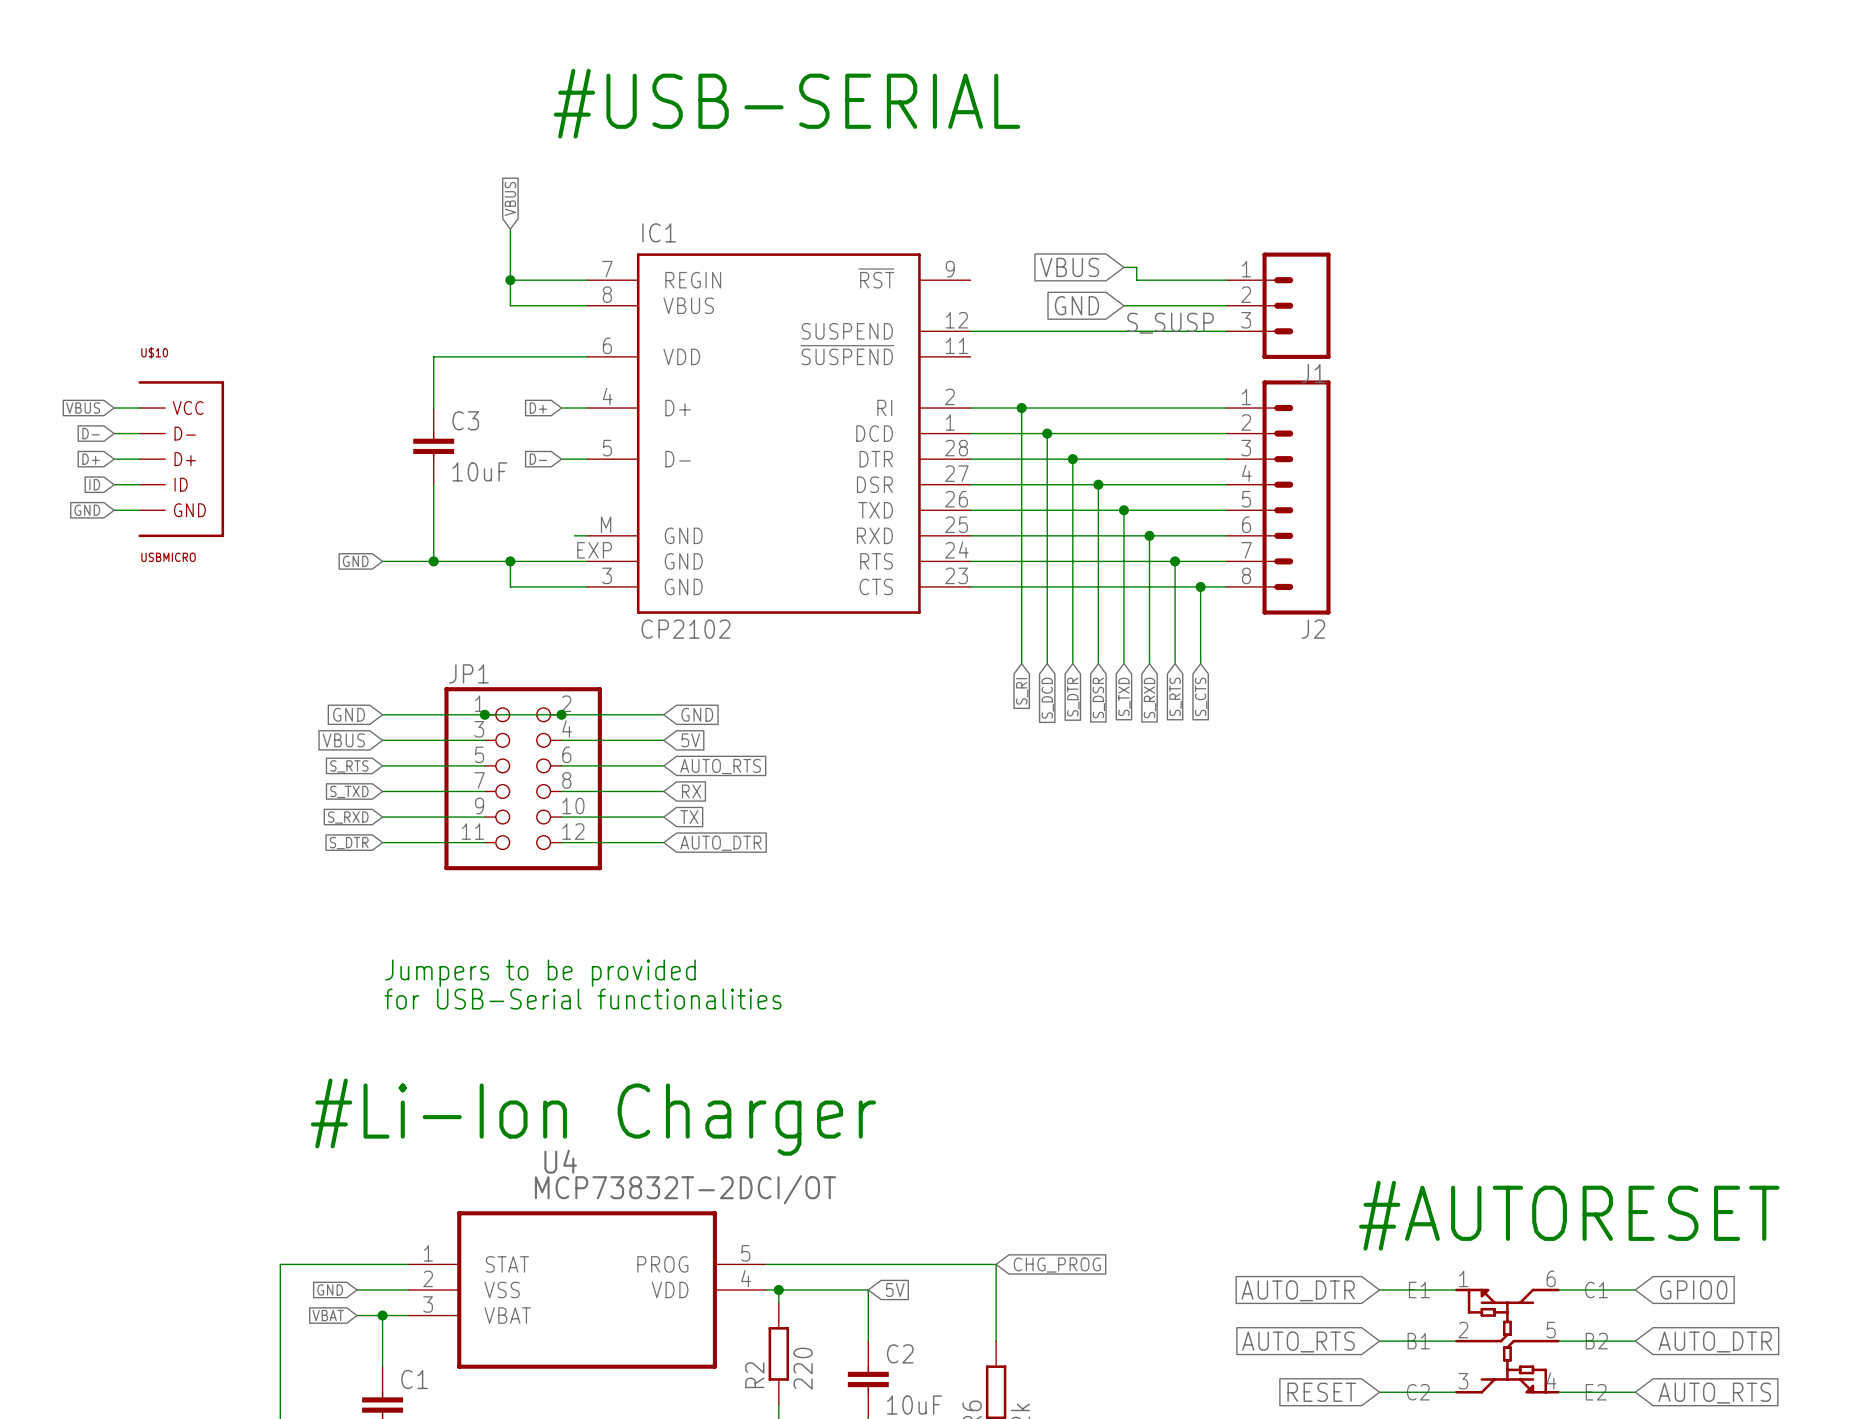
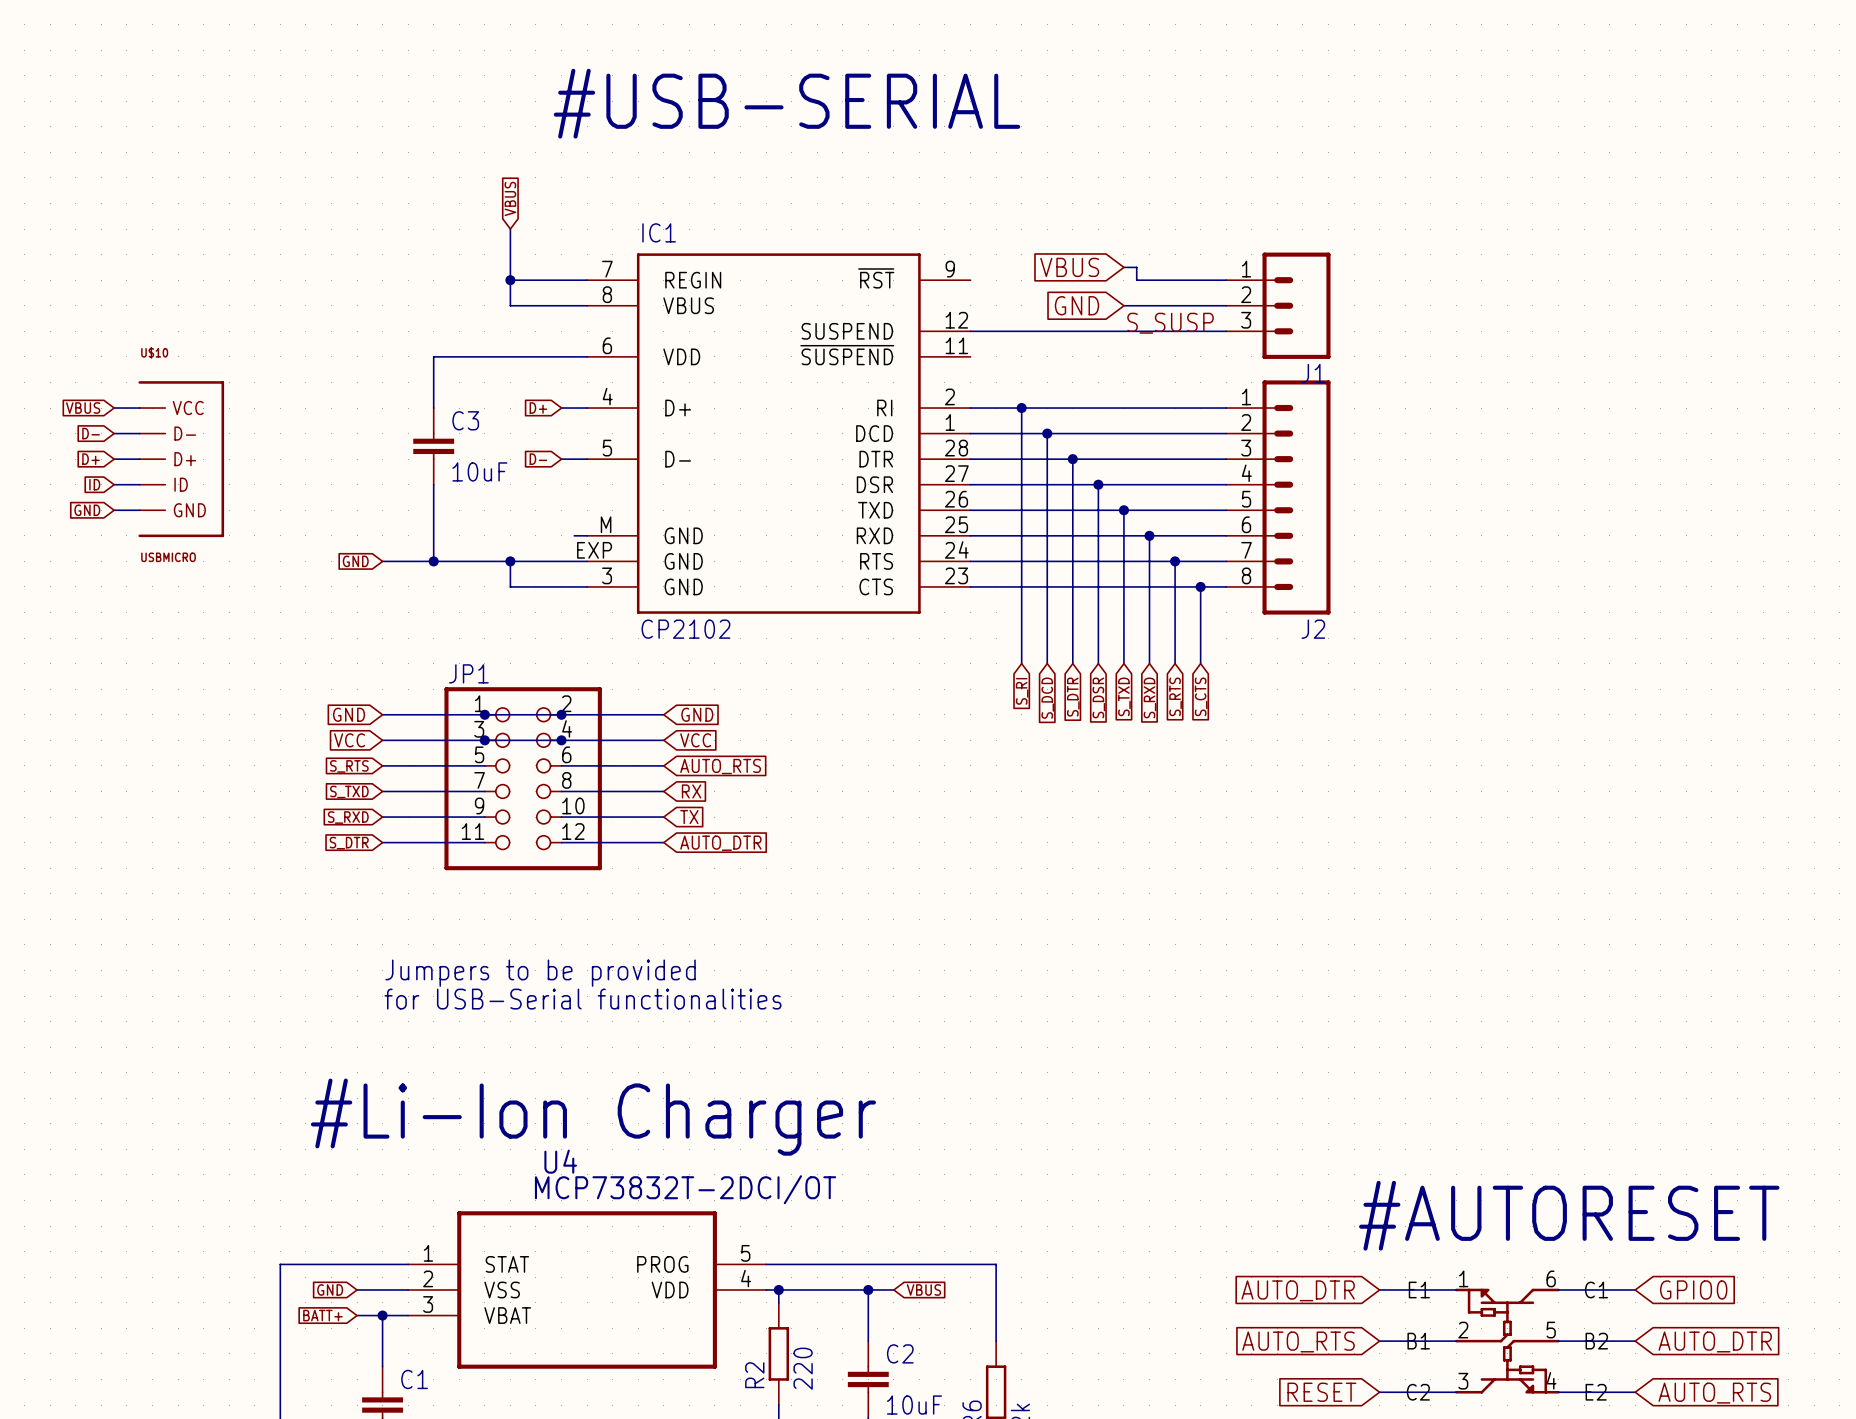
global label: VBUS (343, 740) -> VCC (349, 740)
wire: none -> (484, 740) (561, 740)
junction: none -> (484, 740)
junction: none -> (561, 740)
global label: 5V (690, 740) -> VCC (695, 740)
global label: CHG_PROG (1057, 1265) -> none
wire: none -> (868, 1289) (893, 1289)
junction: none -> (868, 1289)
global label: 5V (895, 1289) -> none
global label: none -> VBUS (923, 1289)
global label: VBAT (328, 1315) -> BATT+ (322, 1315)

